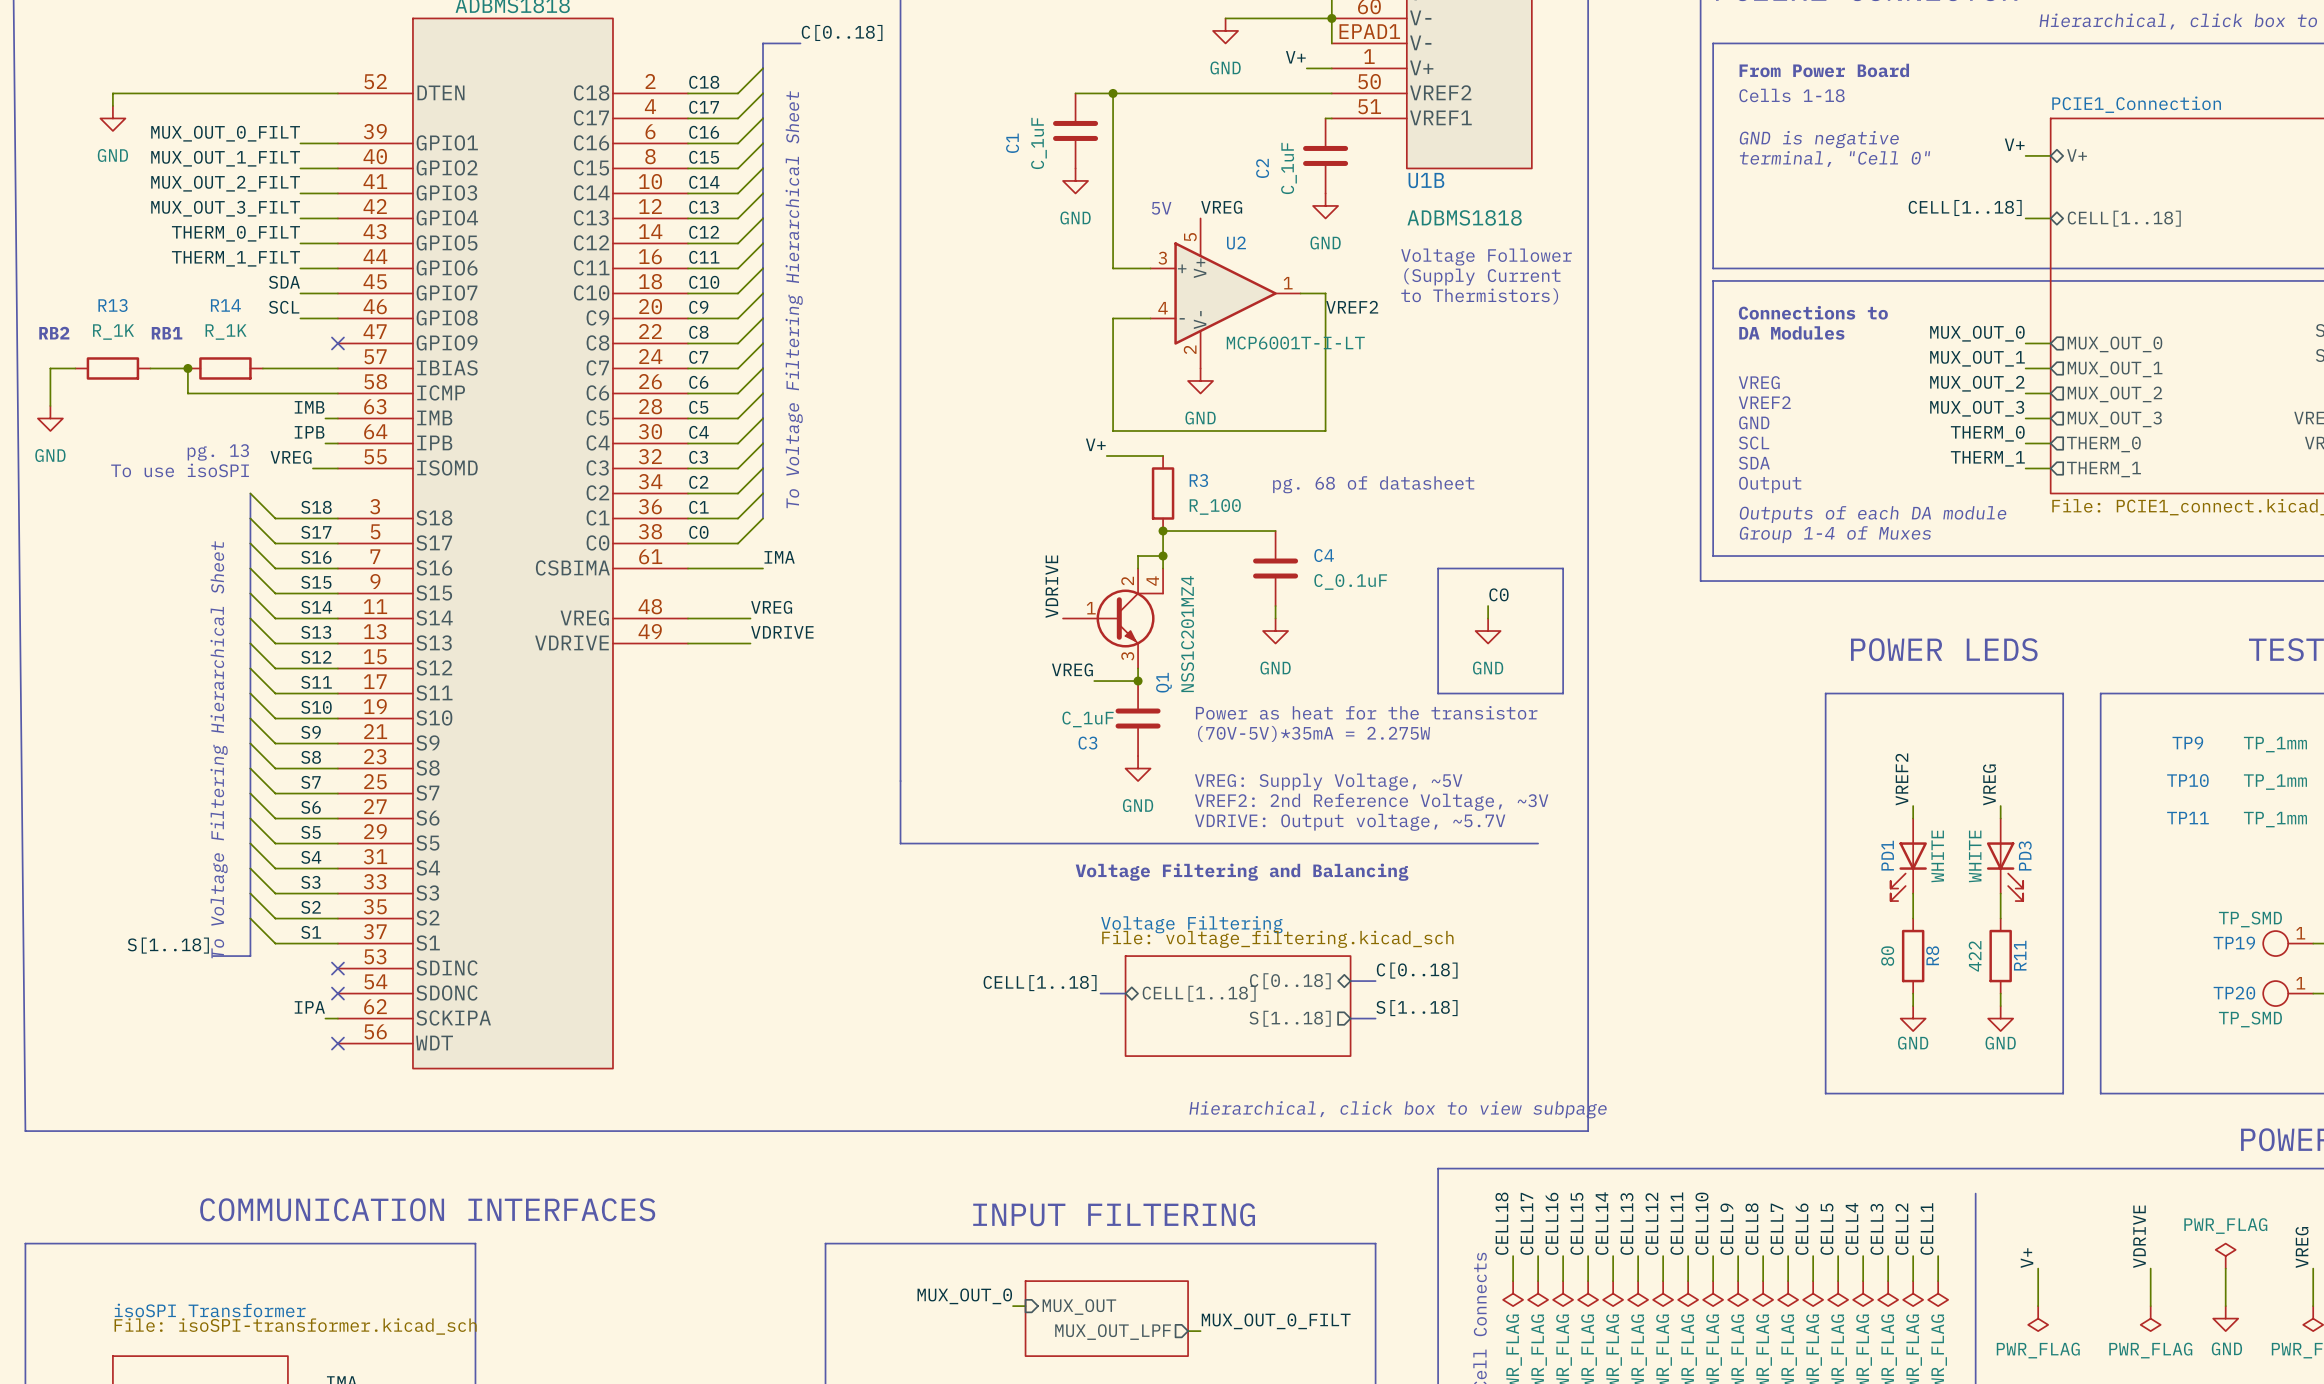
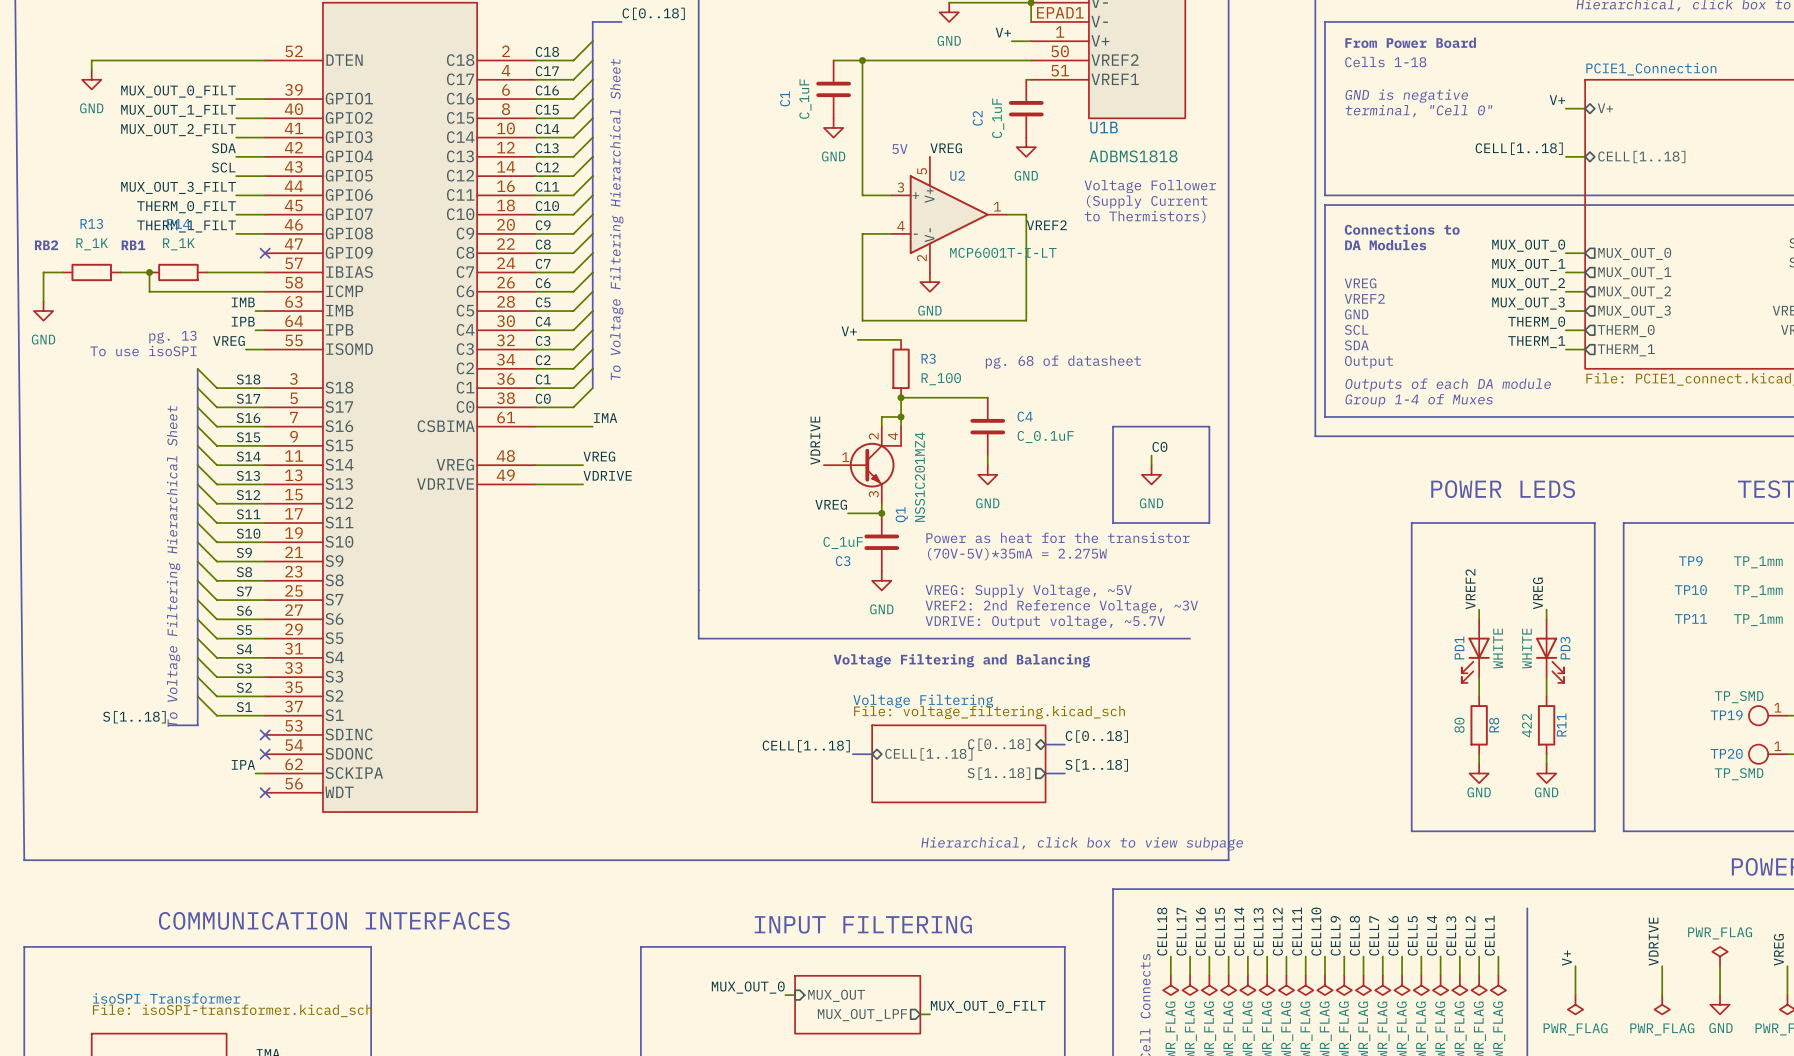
label: MUX_OUT_3_FILT (225, 208) -> SDA (223, 148)
label: THERM_0_FILT (235, 233) -> SCL (223, 167)
label: THERM_1_FILT (235, 258) -> MUX_OUT_3_FILT (178, 187)
label: SDA (284, 282) -> THERM_0_FILT (186, 207)
label: SCL (284, 307) -> THERM_1_FILT (186, 226)

